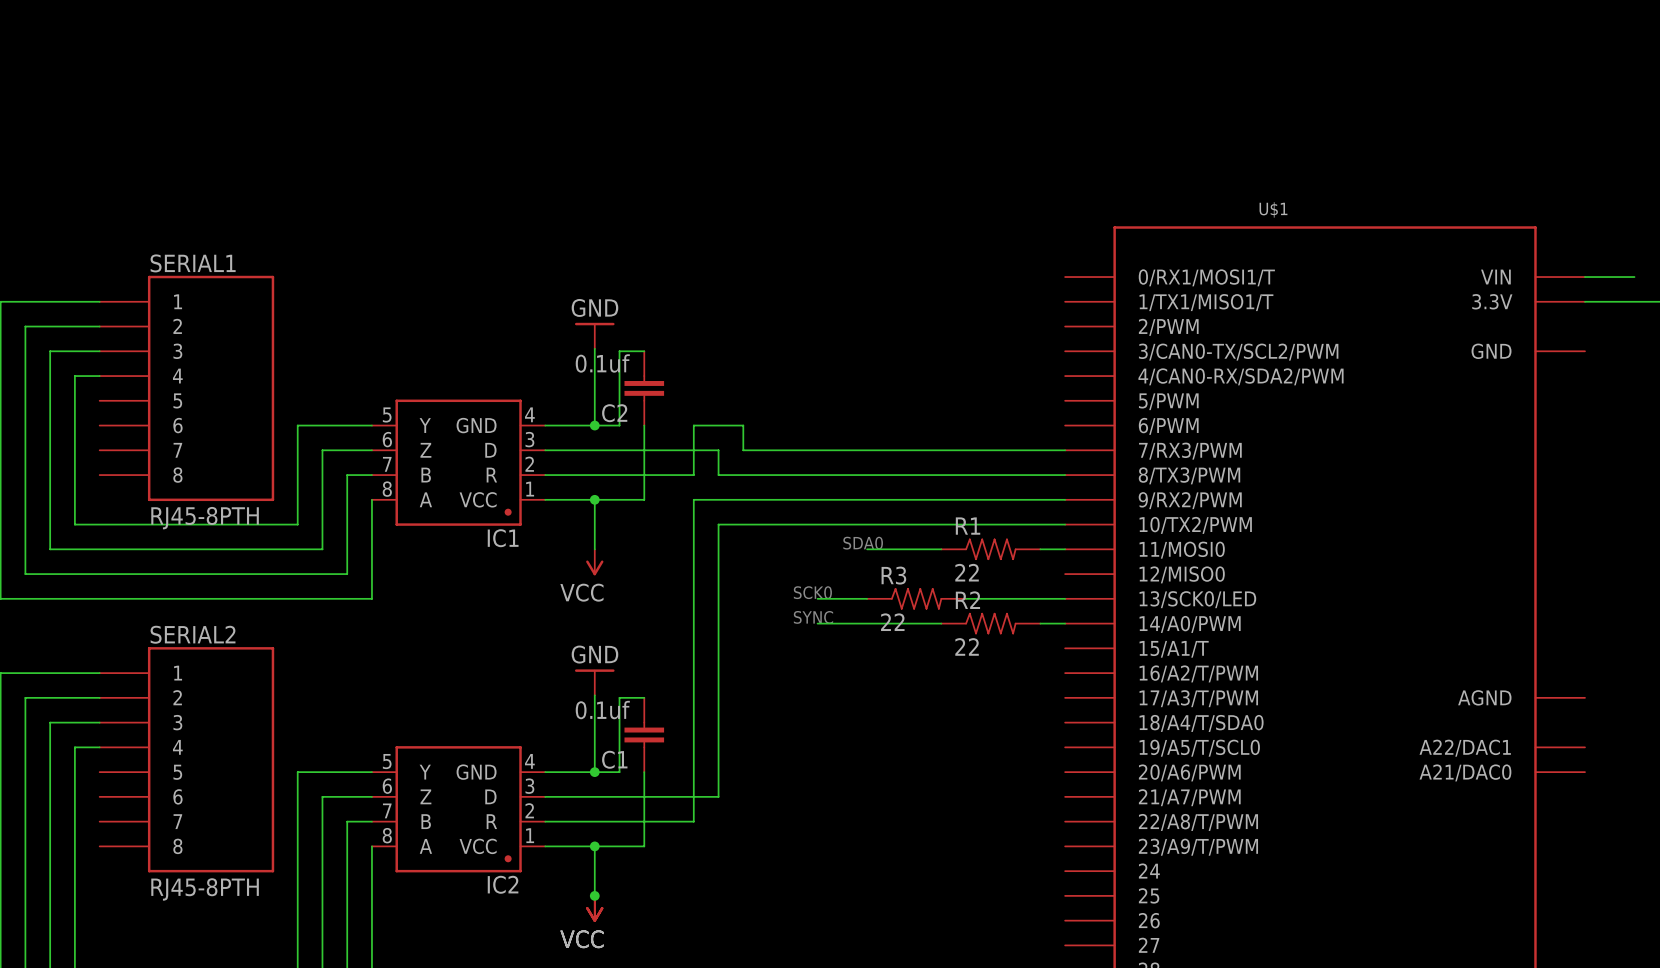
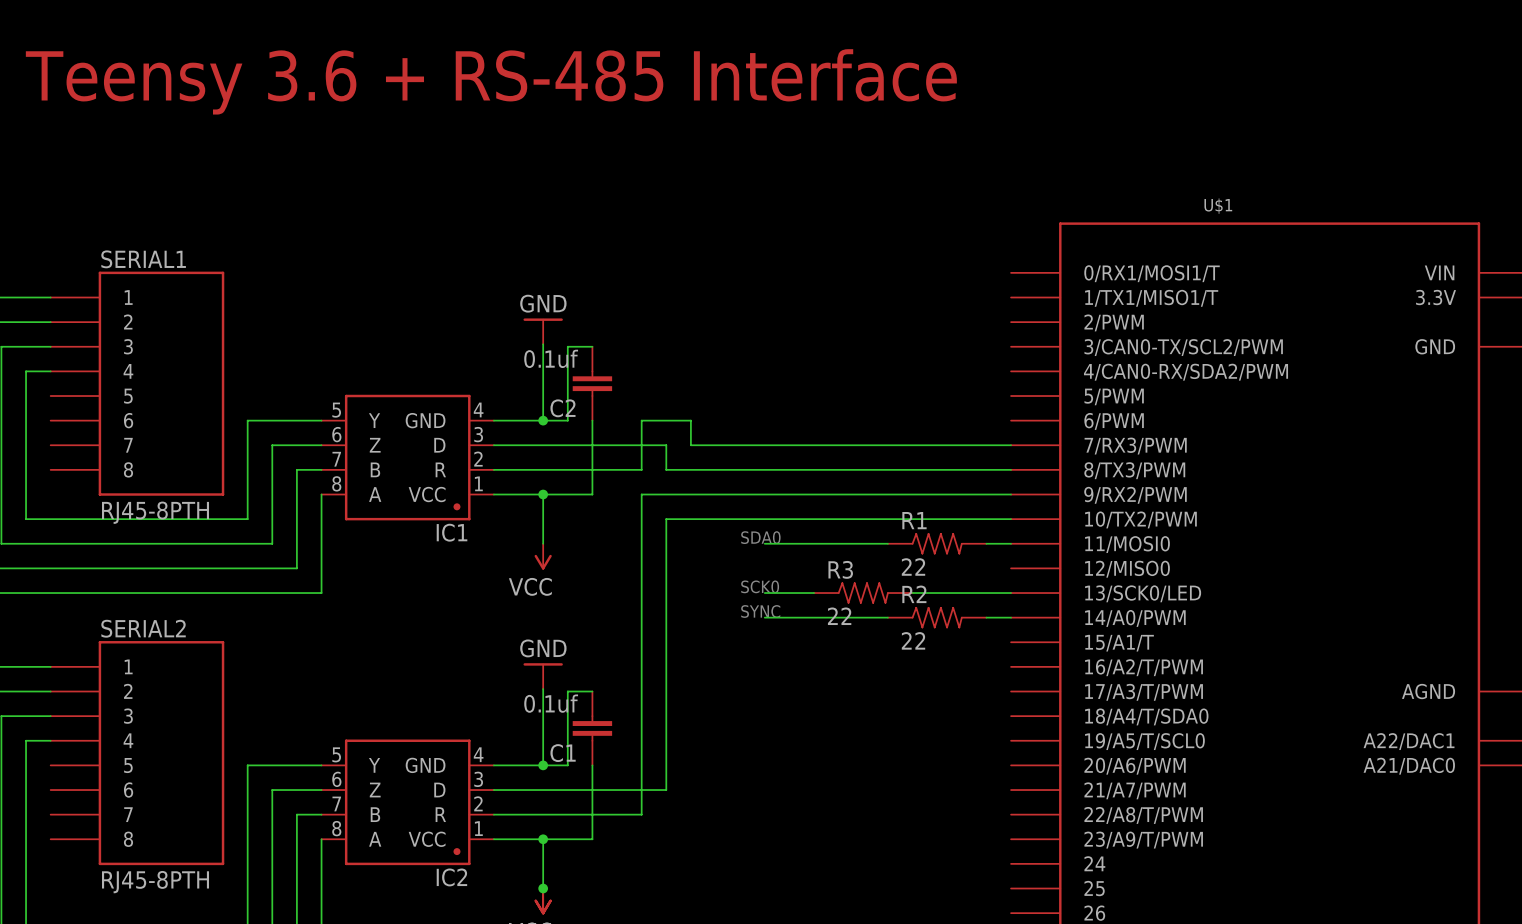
text: none -> Teensy 3.6 + RS-485 Interface (491, 81)
text position: SDA0 (863, 543) -> SDA0 (760, 537)
wire: none -> (764, 543) (814, 543)

